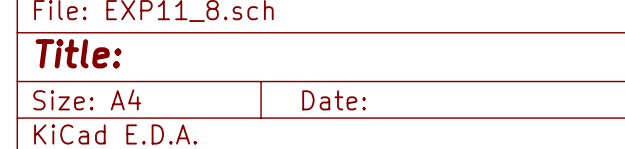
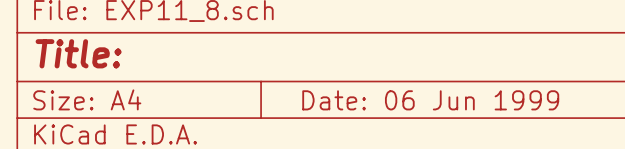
title block: Date: (334, 100) -> Date: 06 Jun 1999 (430, 100)

